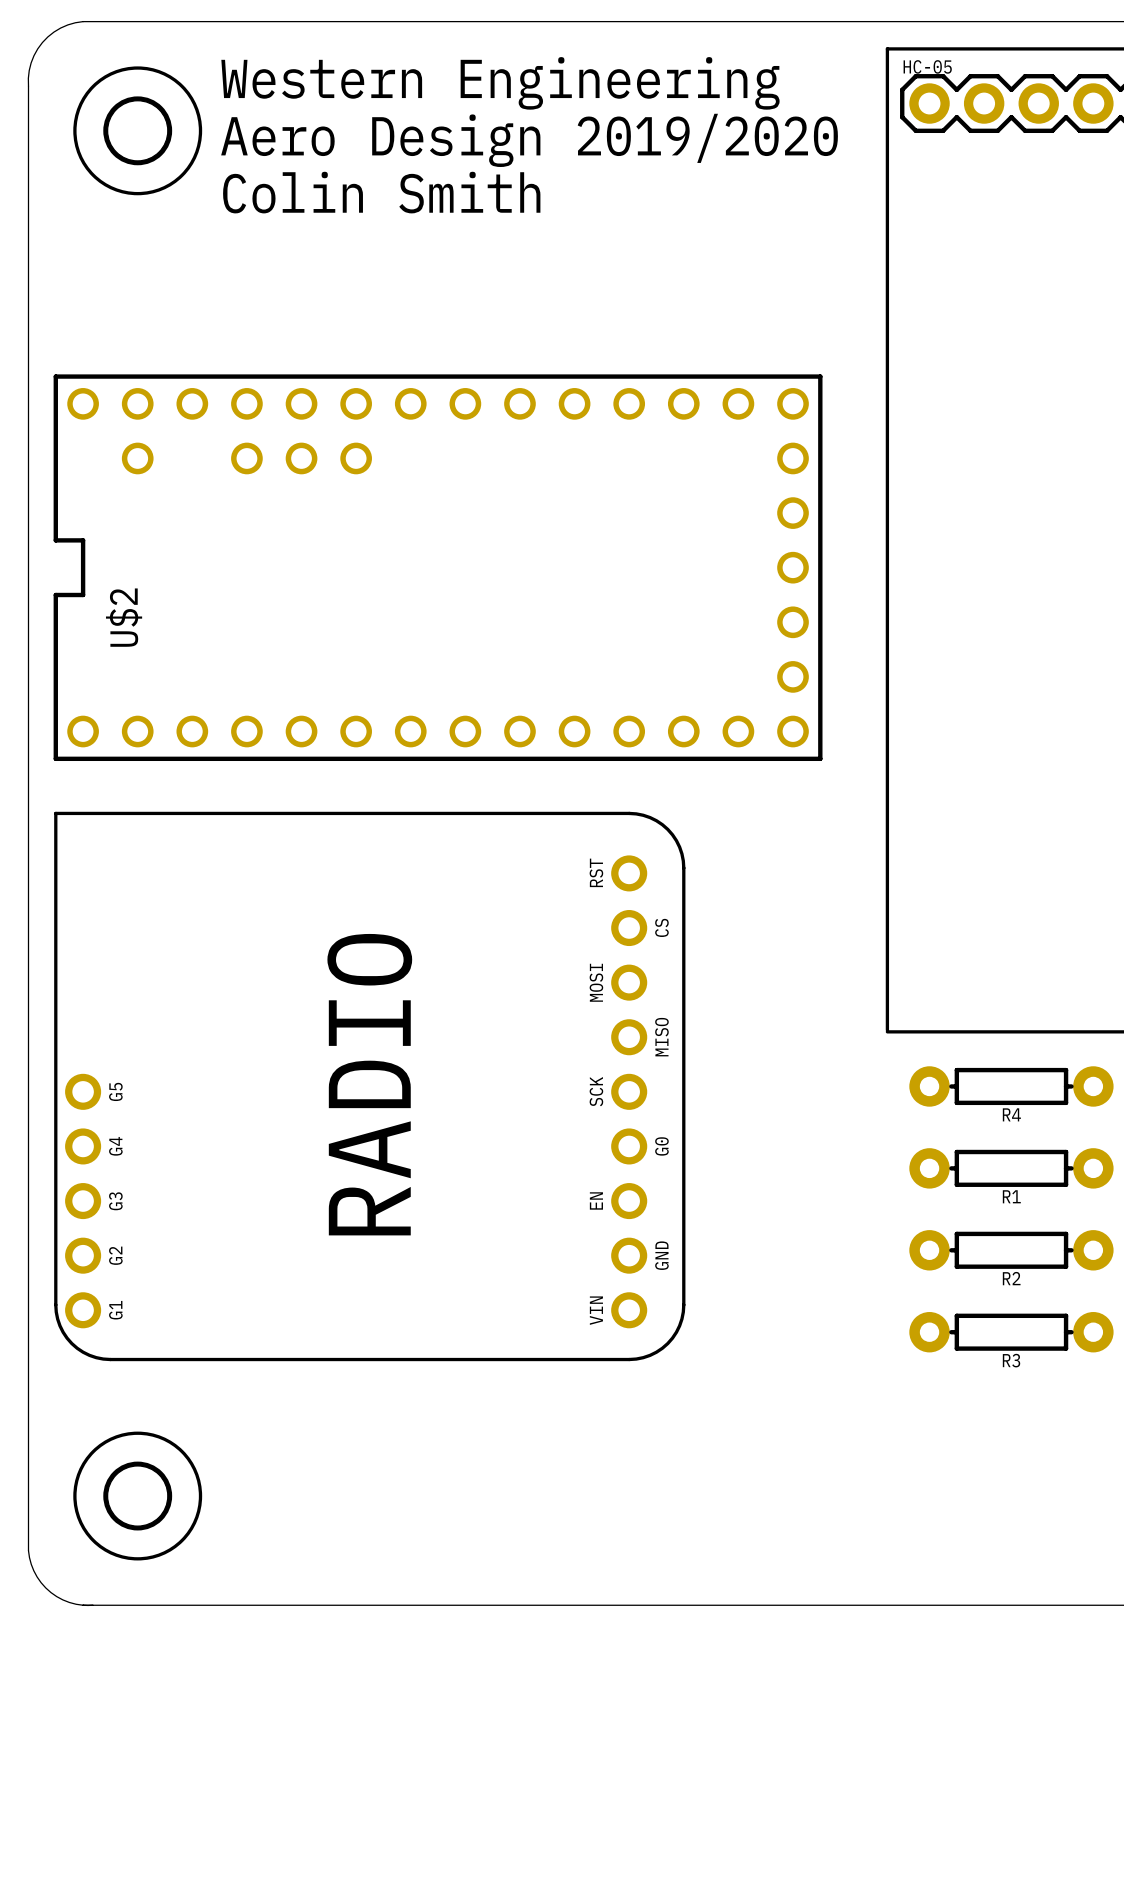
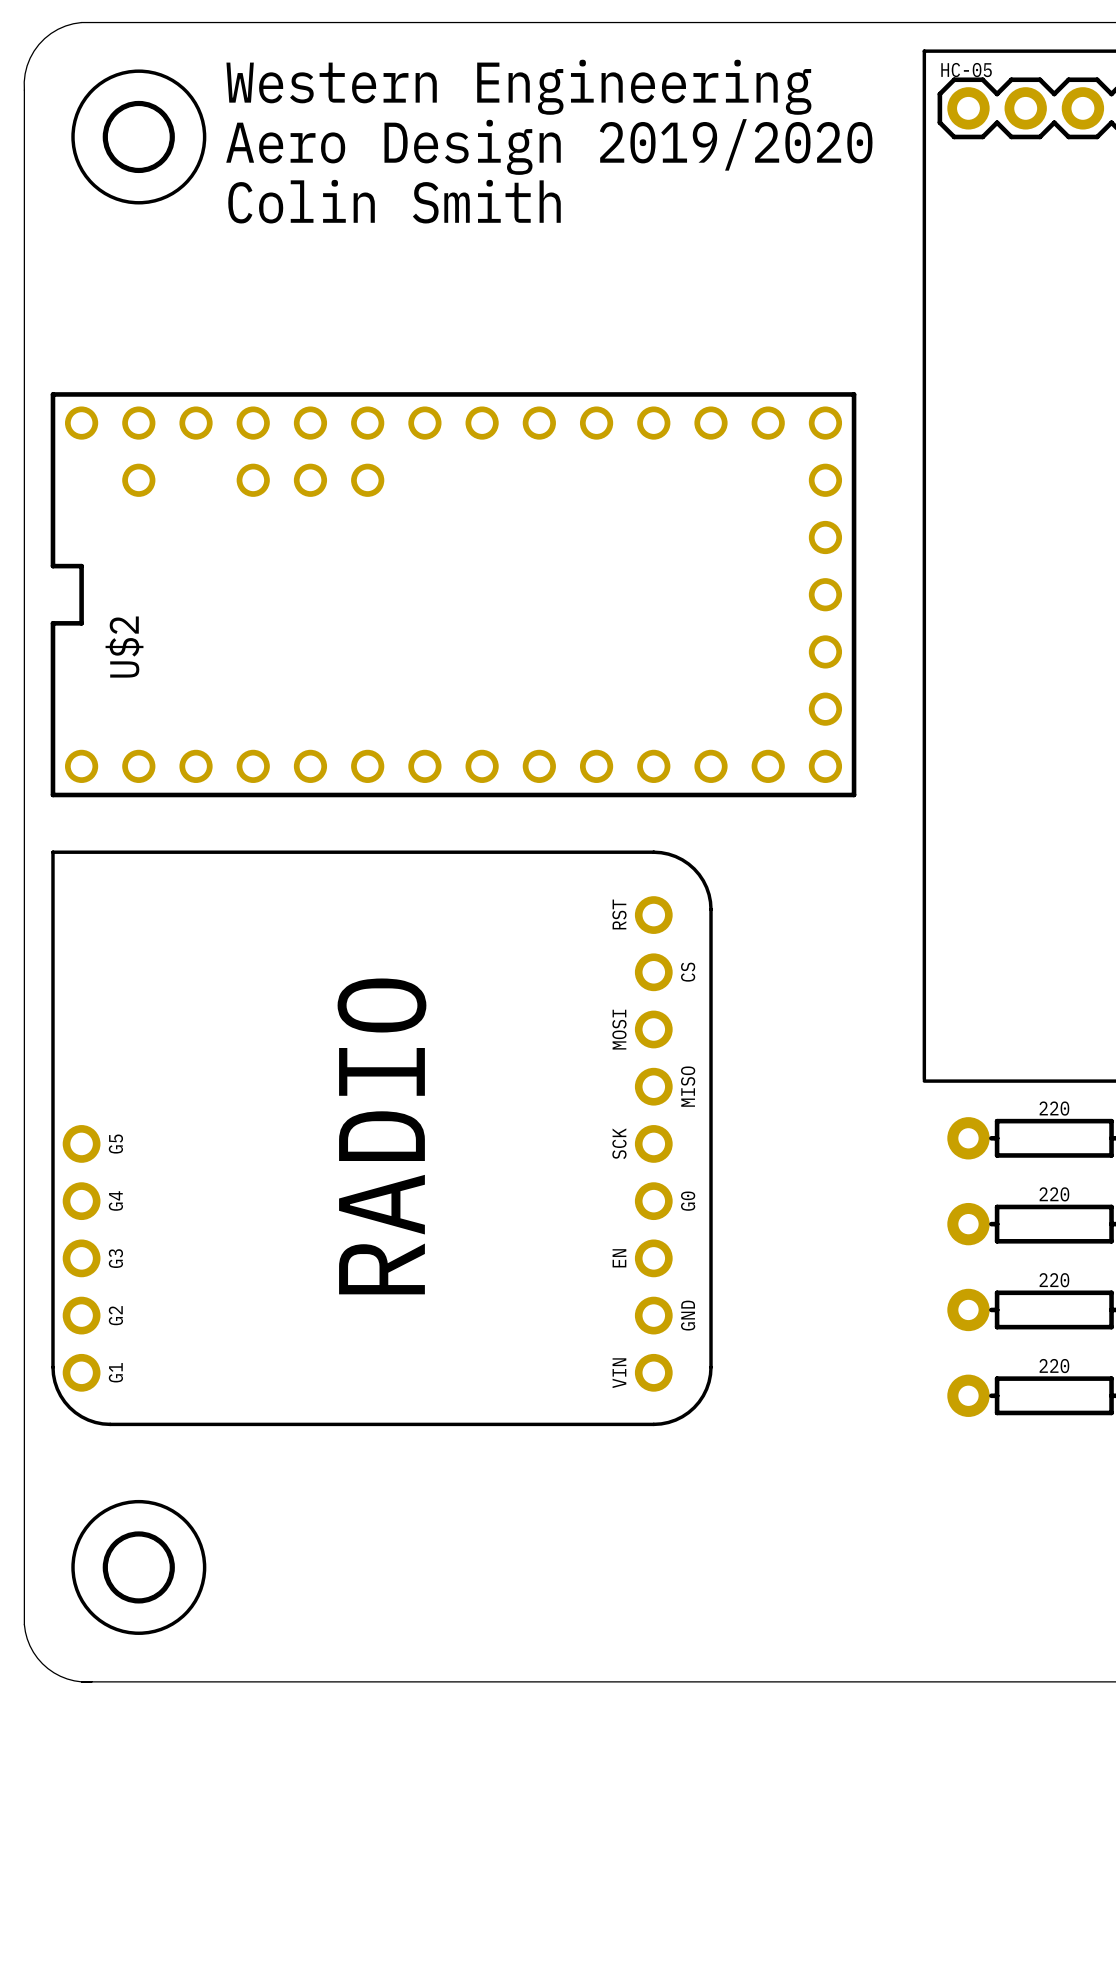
R4 value: none -> 220 (1054, 1108)
R4 name: R4 (1011, 1114) -> none
R1 value: none -> 220 (1054, 1194)
R1 name: R1 (1011, 1196) -> none
R2 value: none -> 220 (1054, 1280)
R2 name: R2 (1011, 1278) -> none
R3 value: none -> 220 (1054, 1366)
R3 name: R3 (1011, 1360) -> none

